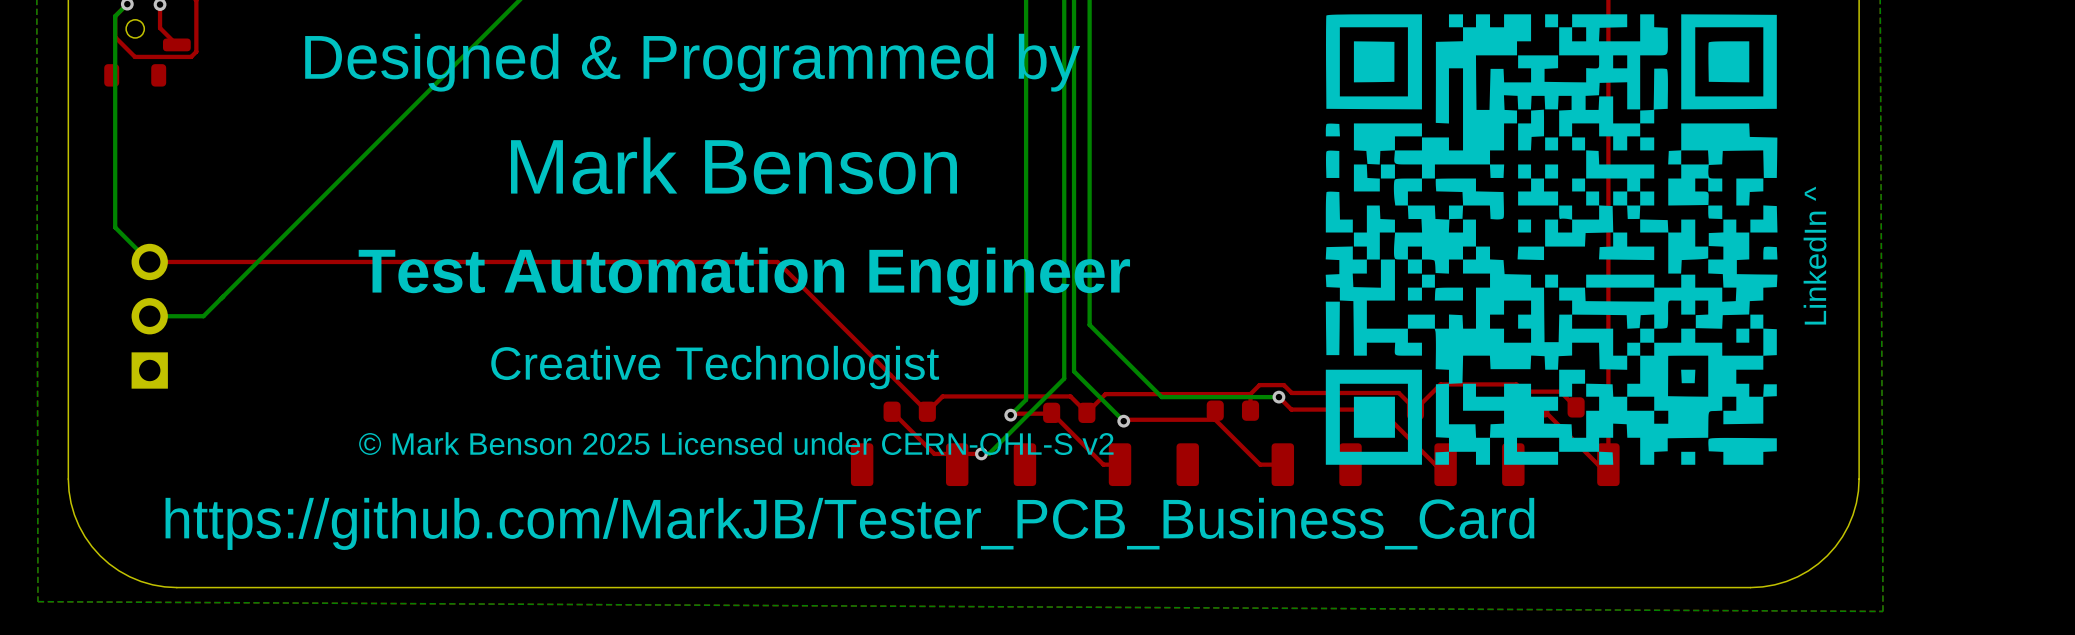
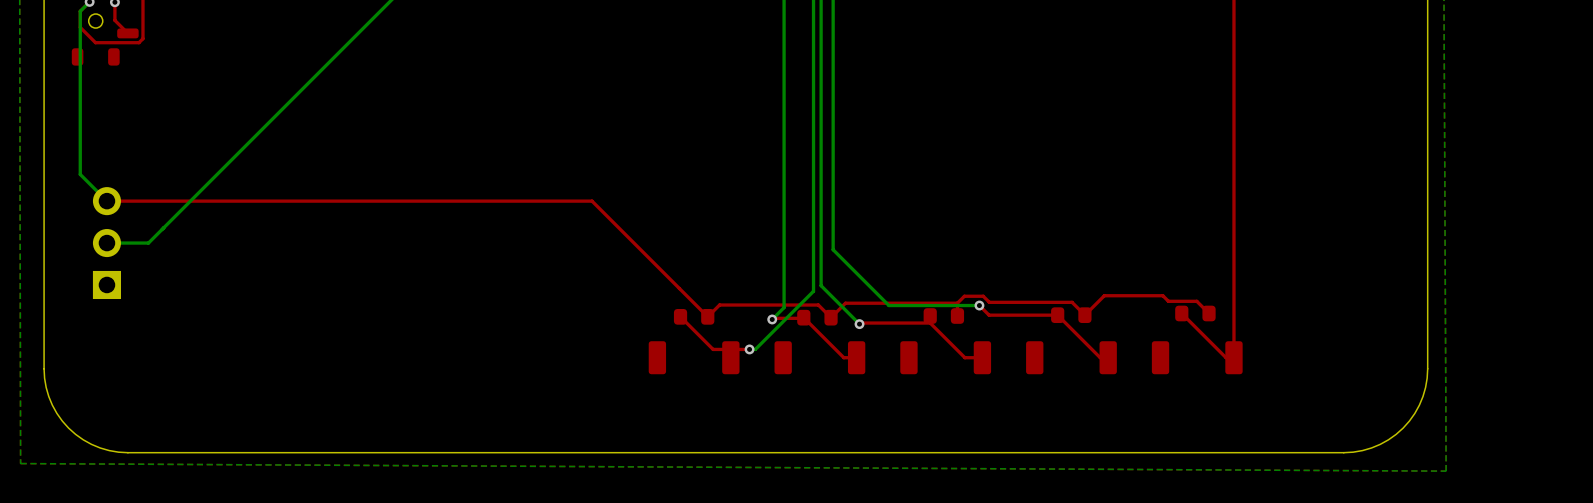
drawing: [1325, 14, 1778, 465] -> none
text: Designed & Programmed by (692, 62) -> none
text: Mark Benson (734, 165) -> none
text: LinkedIn ^ (1815, 255) -> none
text: Test Automation Engineer (744, 276) -> none
text: Creative Technologist (715, 367) -> none
text: © Mark Benson 2025 Licensed under CERN-OHL-S v2 (736, 443) -> none
text: https://github.com/MarkJB/Tester_PCB_Business_Card (849, 523) -> none

